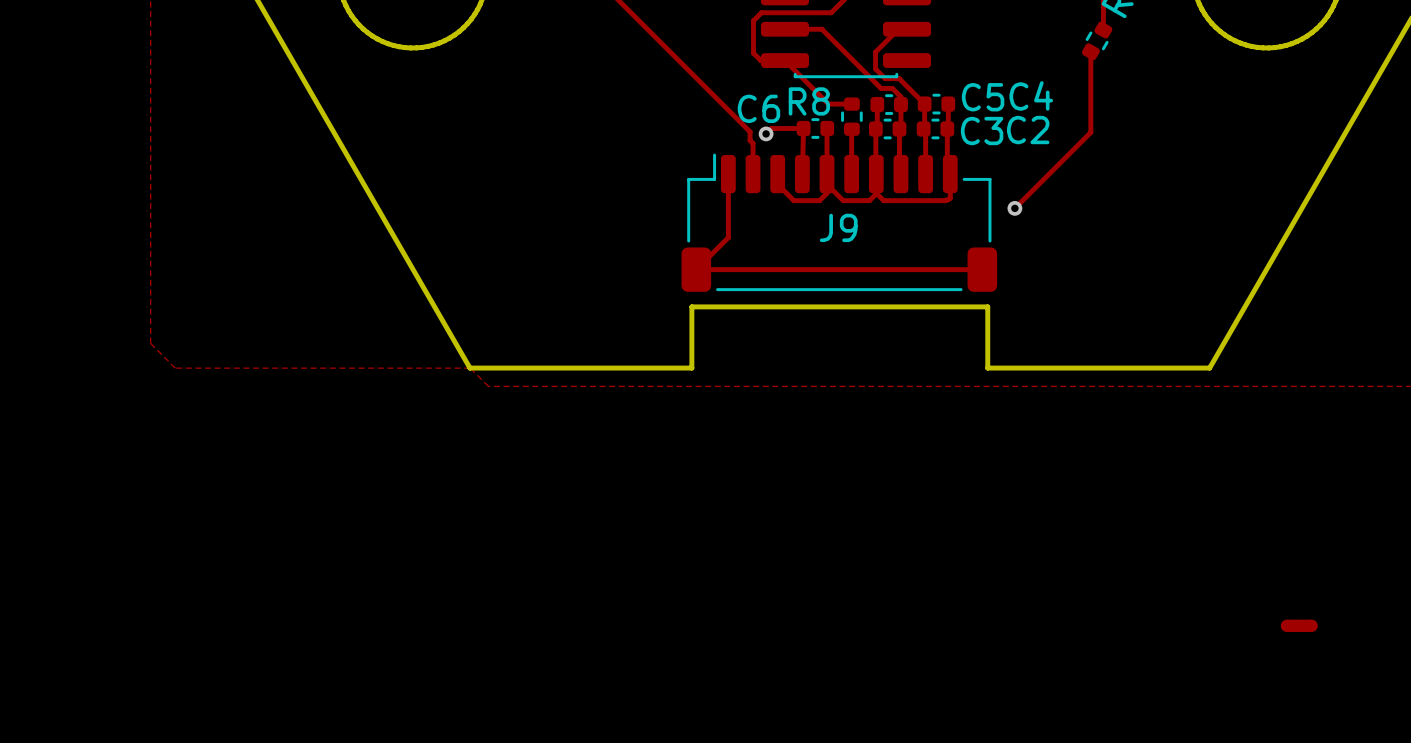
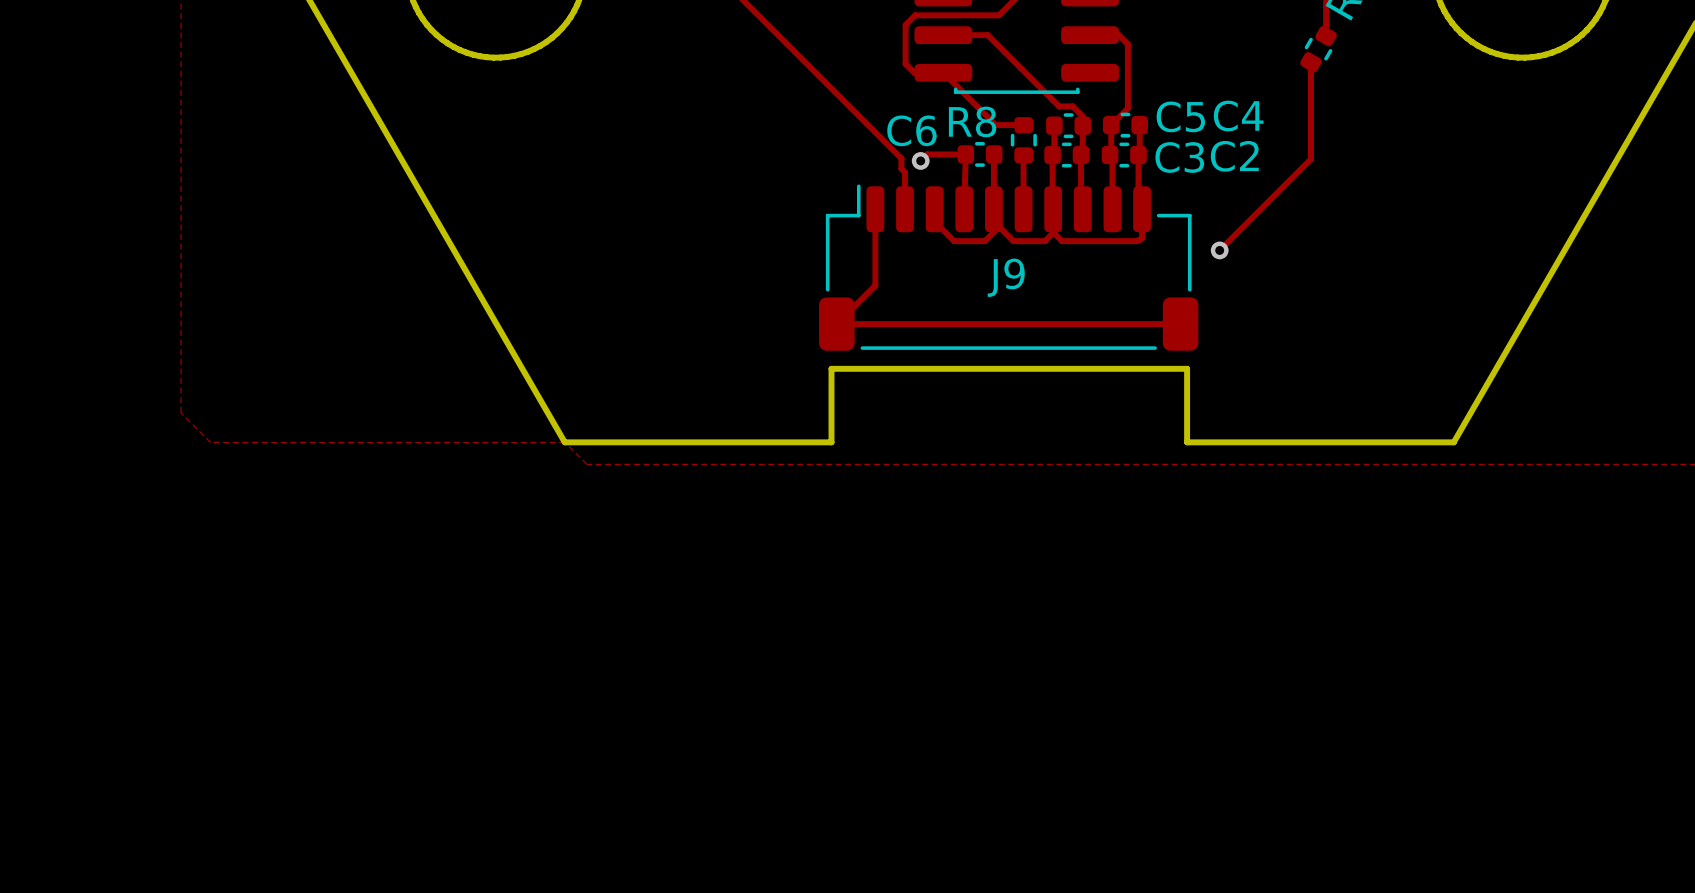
track: (907, 29) (898, 29) (875, 52) (875, 68) (885, 78) (899, 78) (924, 104) -> (1090, 35) (1118, 35) (1127, 44) (1127, 108) (1111, 125)
part: (1299, 625) -> none

